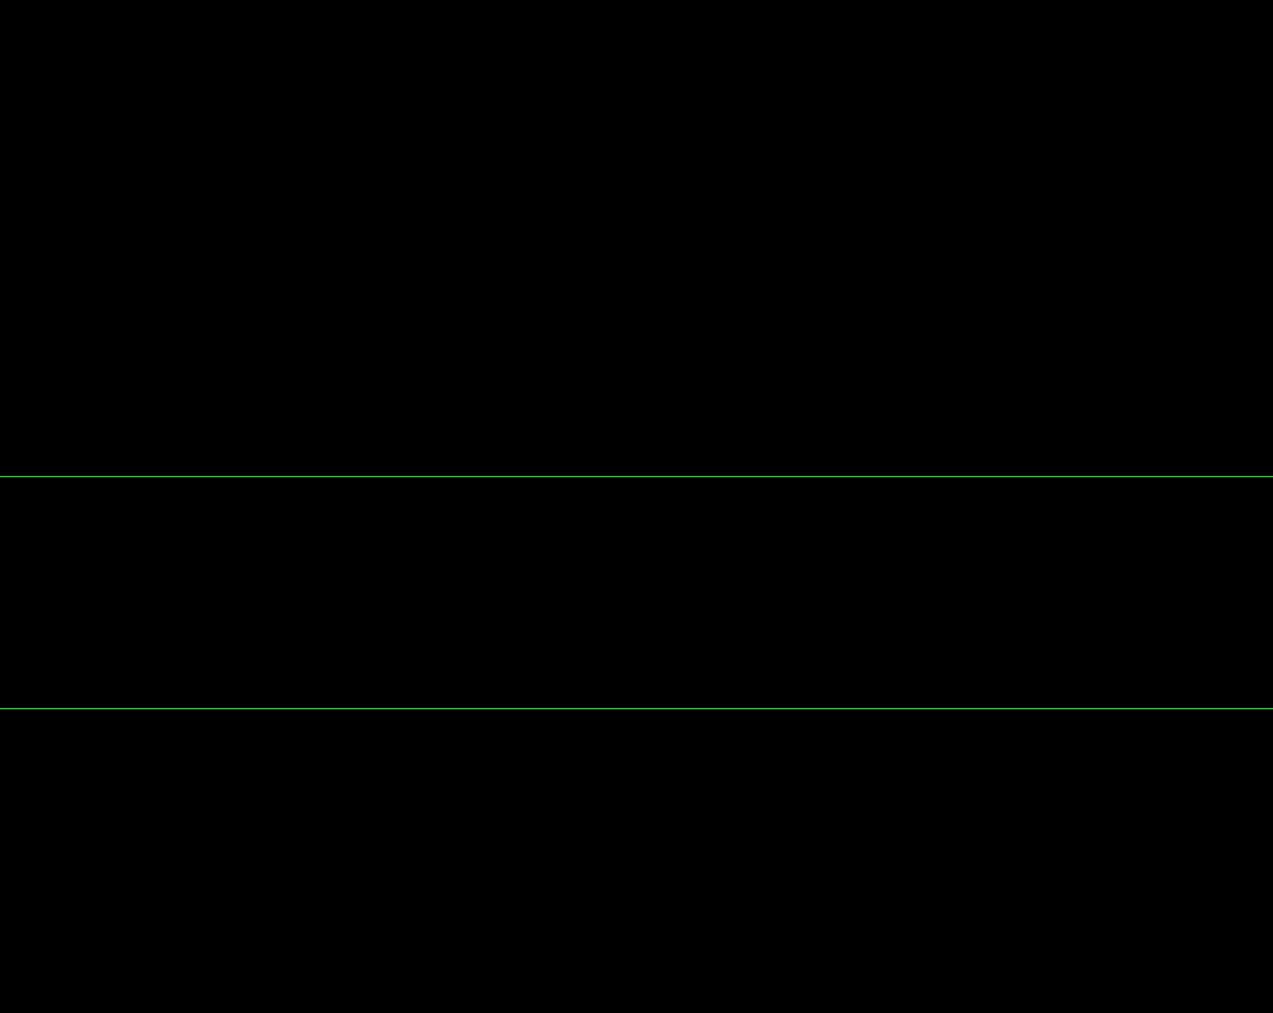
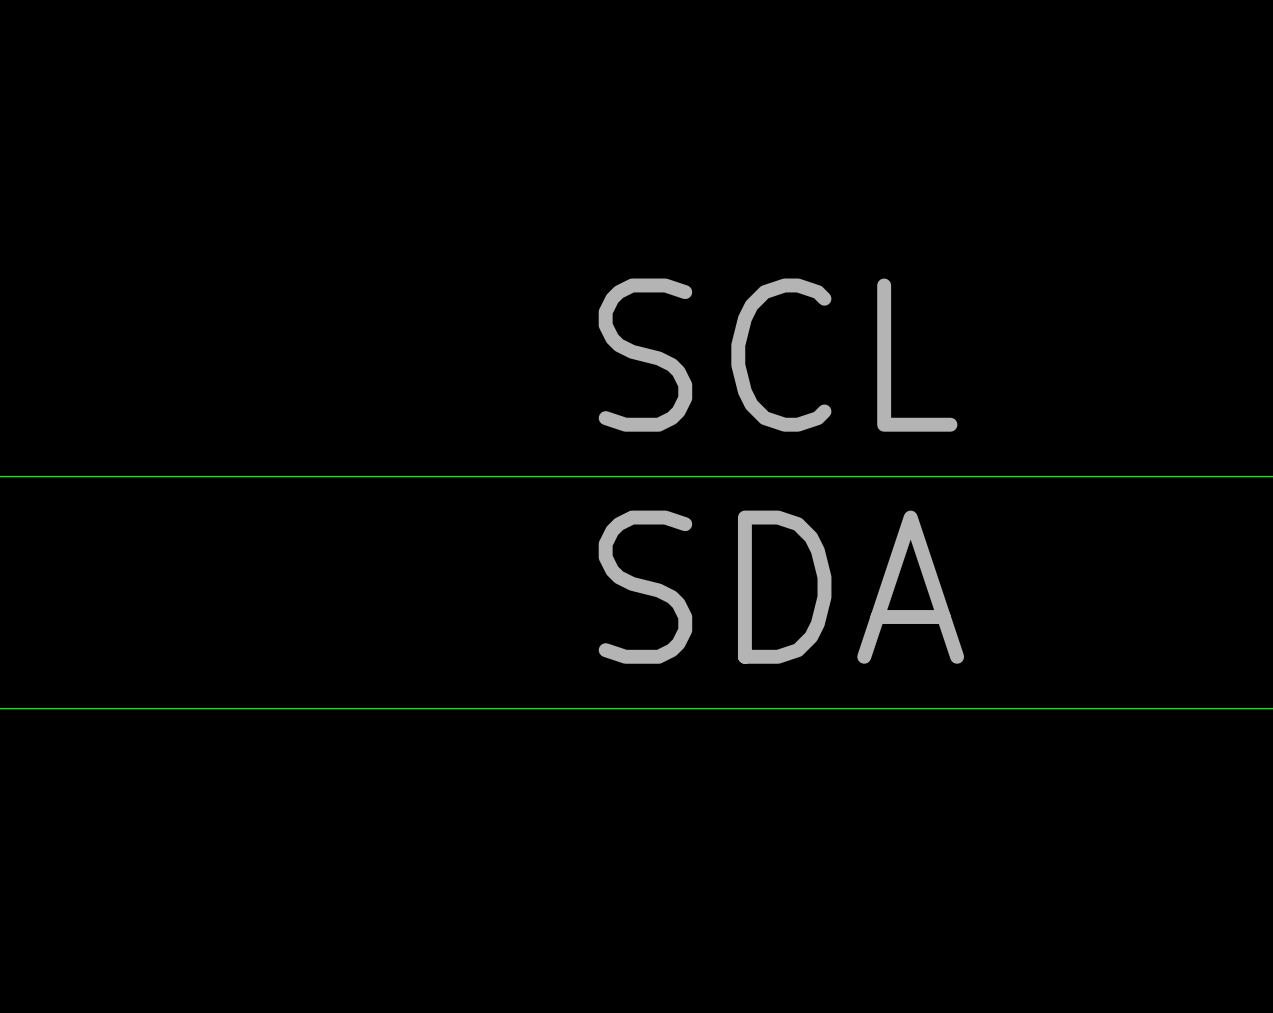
label: none -> SCL (778, 355)
label: none -> SDA (781, 587)

